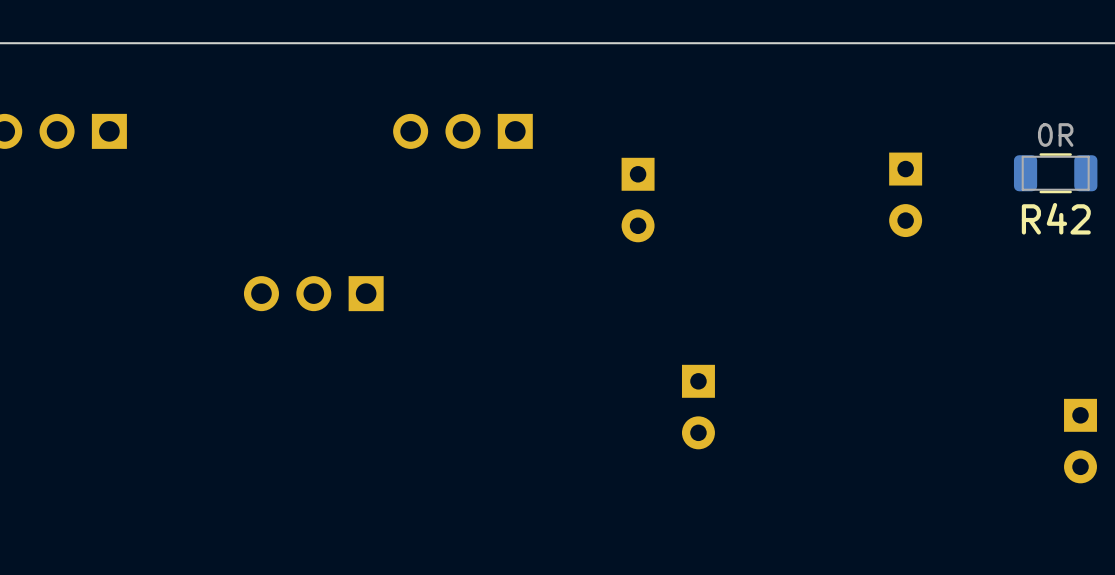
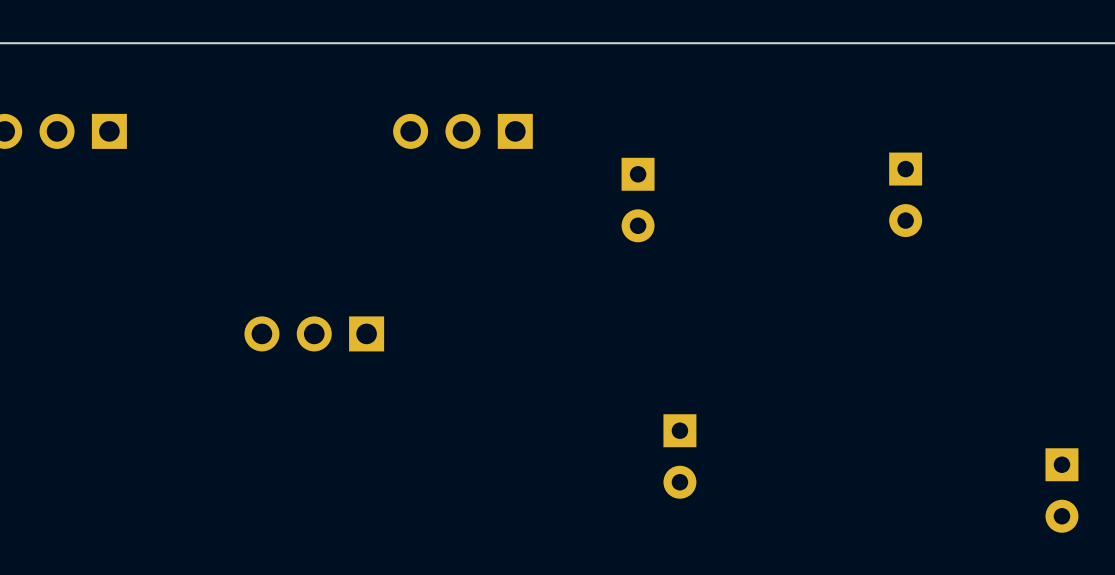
R42: 0R (1055, 173) -> none
part position: (313, 293) -> (314, 333)
part position: (698, 407) -> (679, 456)
part position: (1080, 441) -> (1061, 490)

